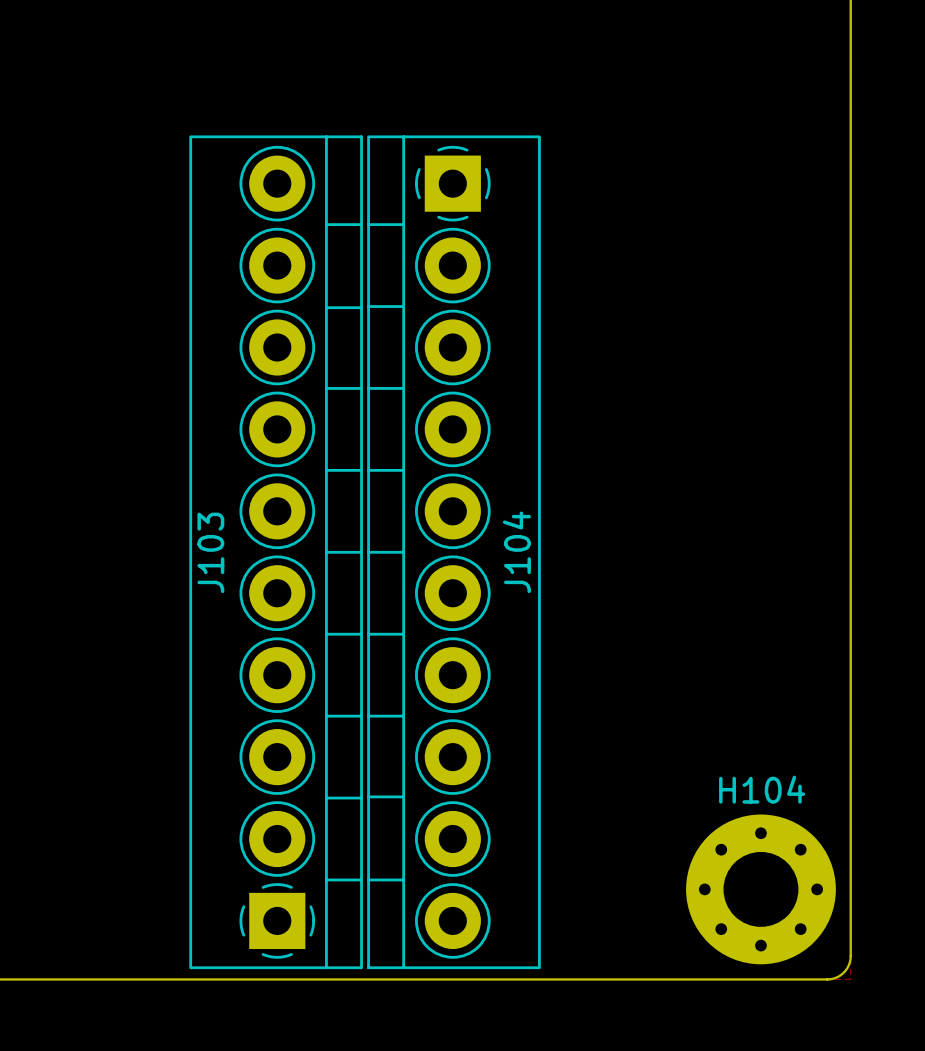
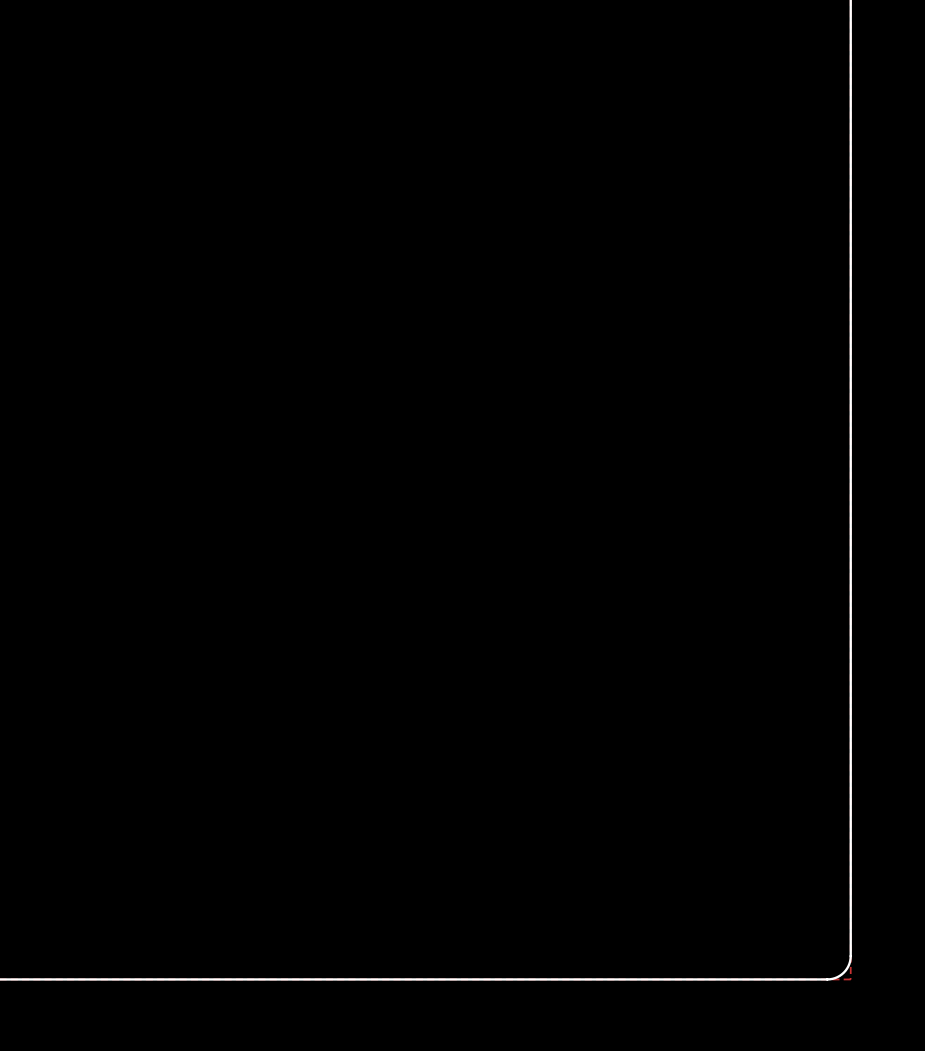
J103: (276, 552) -> none
J104: (454, 552) -> none
H104: (760, 889) -> none

